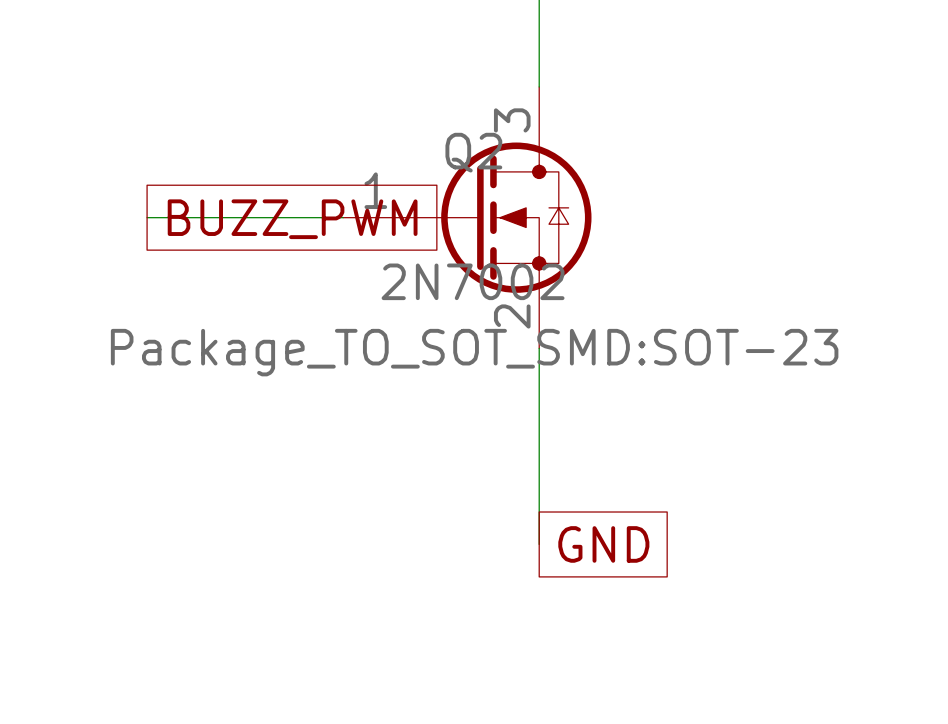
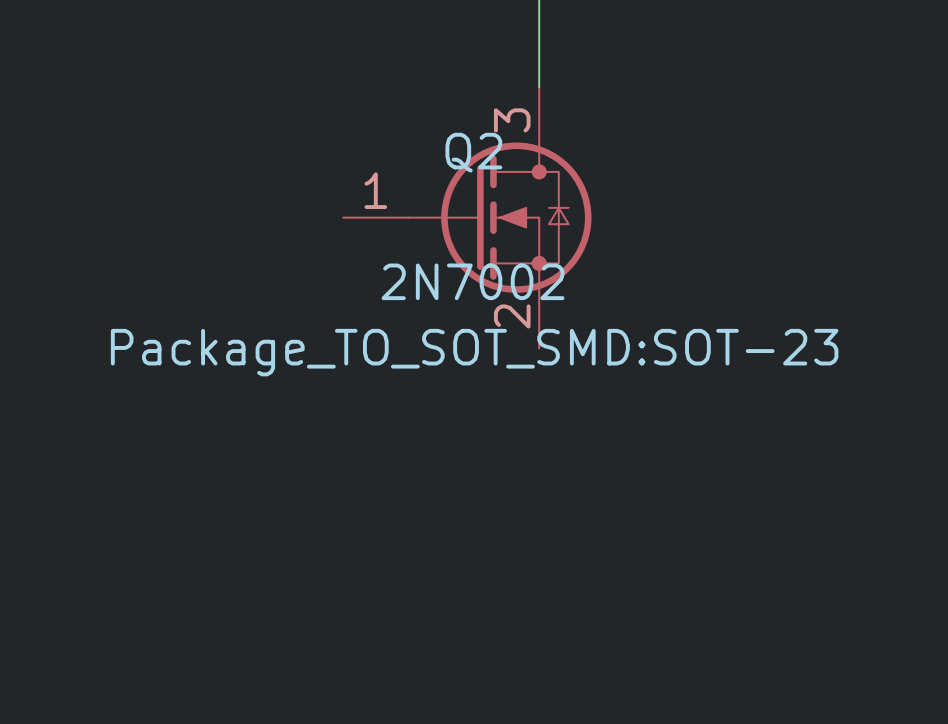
wire: (147, 217) (343, 217) -> none
global label: BUZZ_PWM (292, 219) -> none
wire: (539, 348) (539, 544) -> none
global label: GND (603, 544) -> none

